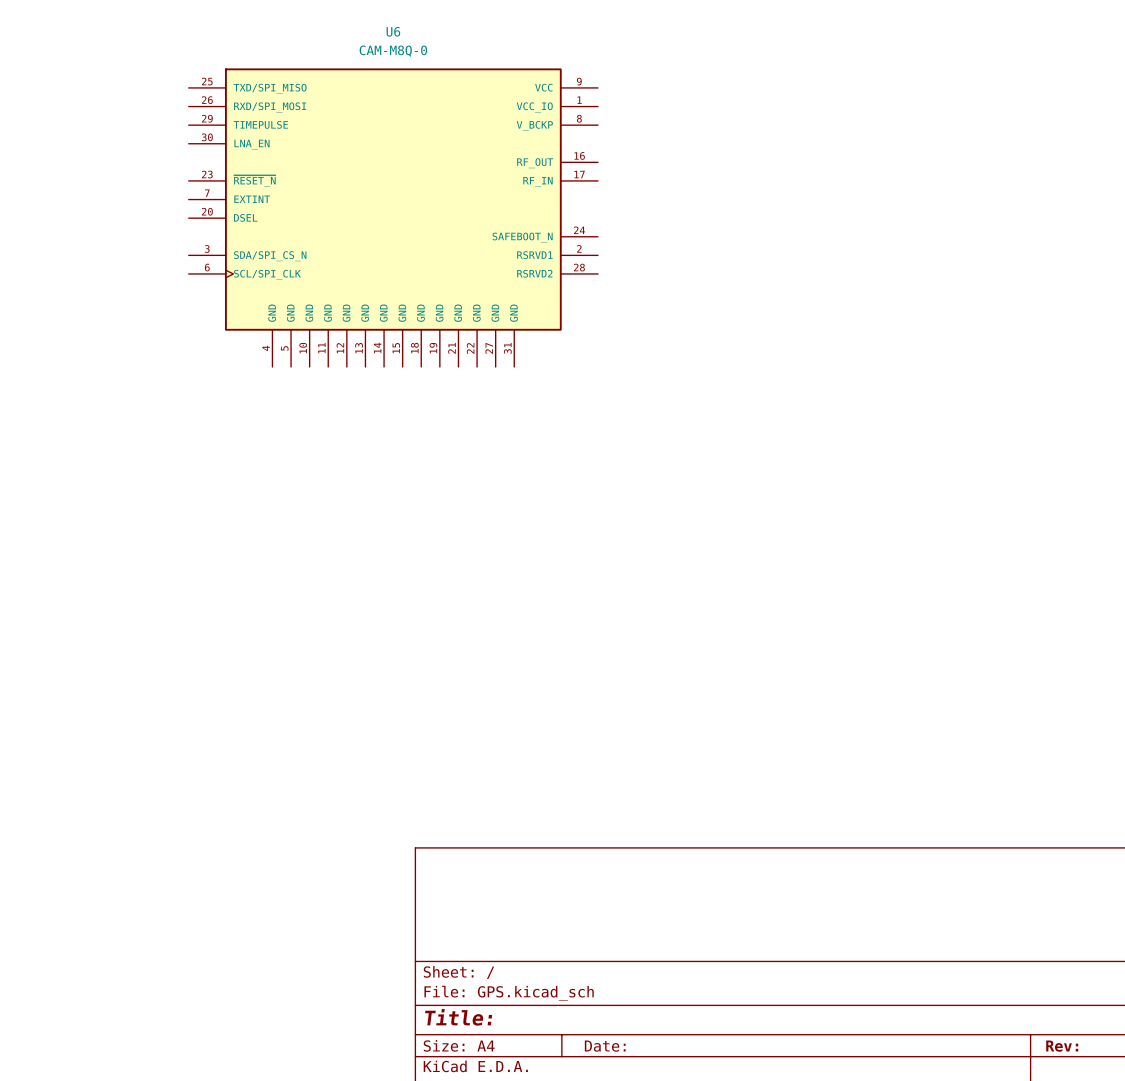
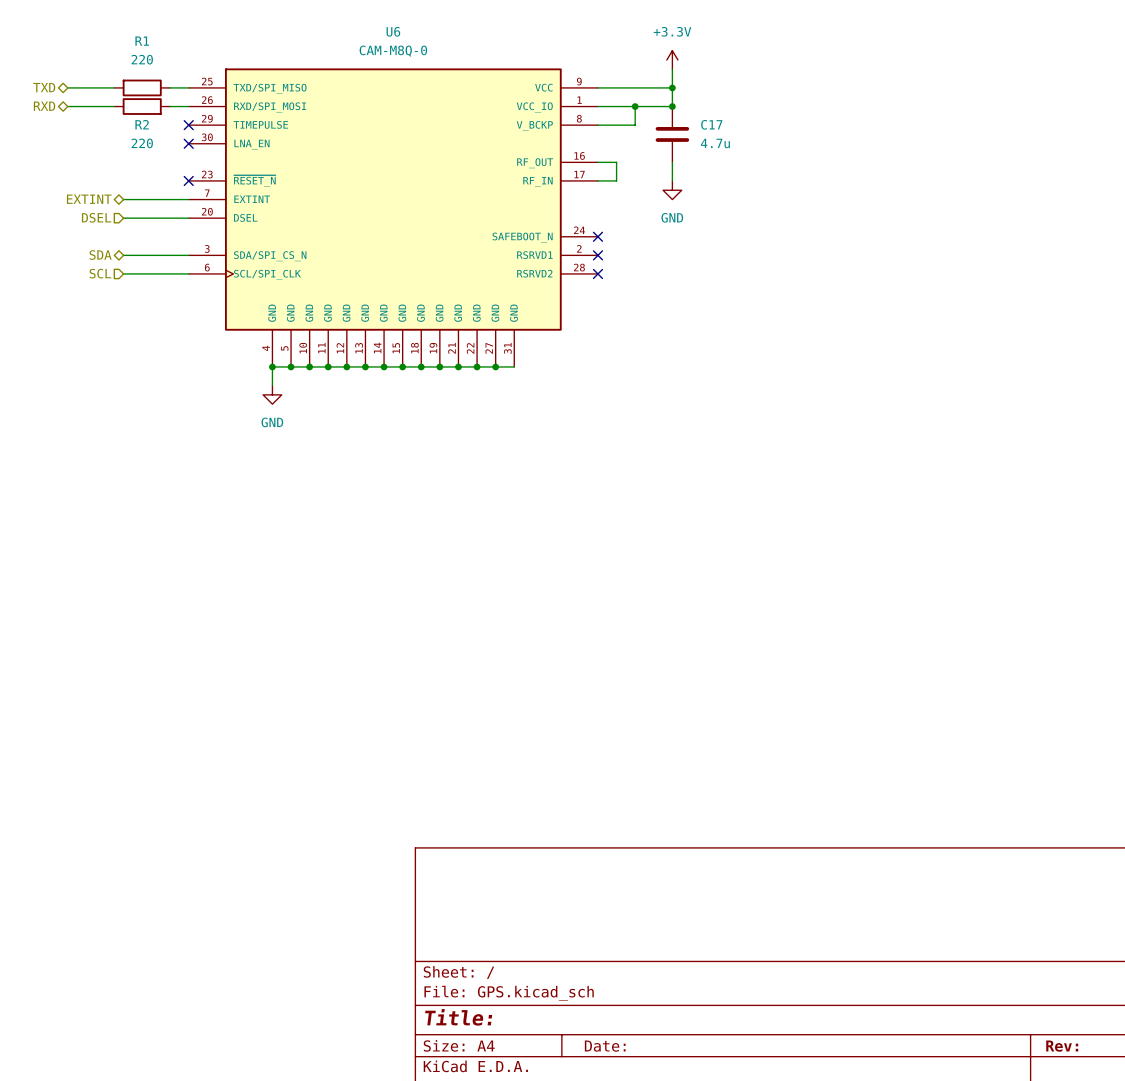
power symbol: none -> +3.3V (672, 60)
wire: none -> (672, 69) (672, 106) (597, 106)
hierarchical label: none -> TXD (44, 87)
wire: none -> (67, 87) (114, 87)
R1: none -> 220 (142, 87)
wire: none -> (170, 87) (188, 87)
wire: none -> (597, 87) (672, 87)
junction: none -> (672, 87)
hierarchical label: none -> RXD (44, 106)
wire: none -> (67, 106) (114, 106)
R2: none -> 220 (142, 106)
wire: none -> (170, 106) (188, 106)
wire: none -> (635, 106) (635, 125) (597, 125)
junction: none -> (635, 106)
junction: none -> (672, 106)
no-connect mark: none -> (188, 125)
C17: none -> 4.7u (672, 134)
no-connect mark: none -> (188, 143)
wire: none -> (597, 162) (616, 162) (616, 180) (597, 180)
wire: none -> (672, 162) (672, 180)
no-connect mark: none -> (188, 180)
power symbol: none -> GND (672, 190)
hierarchical label: none -> EXTINT (89, 199)
wire: none -> (123, 199) (188, 199)
hierarchical label: none -> DSEL (96, 217)
wire: none -> (123, 218) (188, 218)
no-connect mark: none -> (597, 236)
hierarchical label: none -> SDA (100, 255)
wire: none -> (123, 255) (188, 255)
no-connect mark: none -> (597, 255)
hierarchical label: none -> SCL (100, 273)
wire: none -> (123, 273) (188, 273)
no-connect mark: none -> (597, 273)
junction: none -> (272, 366)
junction: none -> (291, 366)
junction: none -> (309, 366)
junction: none -> (328, 366)
junction: none -> (346, 366)
junction: none -> (365, 366)
junction: none -> (384, 366)
junction: none -> (402, 366)
junction: none -> (421, 366)
junction: none -> (439, 366)
junction: none -> (458, 366)
junction: none -> (477, 366)
junction: none -> (495, 366)
wire: none -> (514, 366) (272, 366) (272, 385)
power symbol: none -> GND (272, 394)

